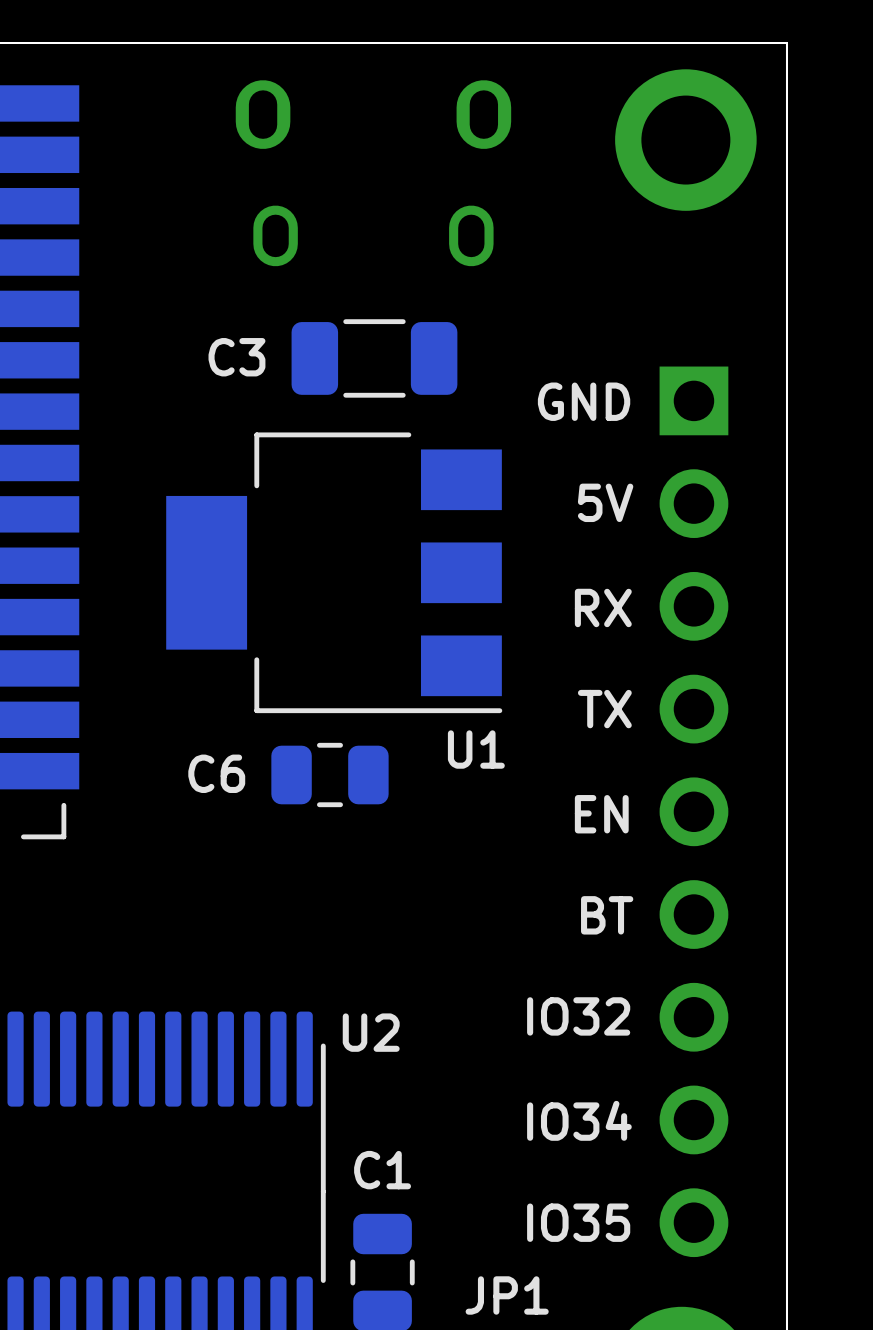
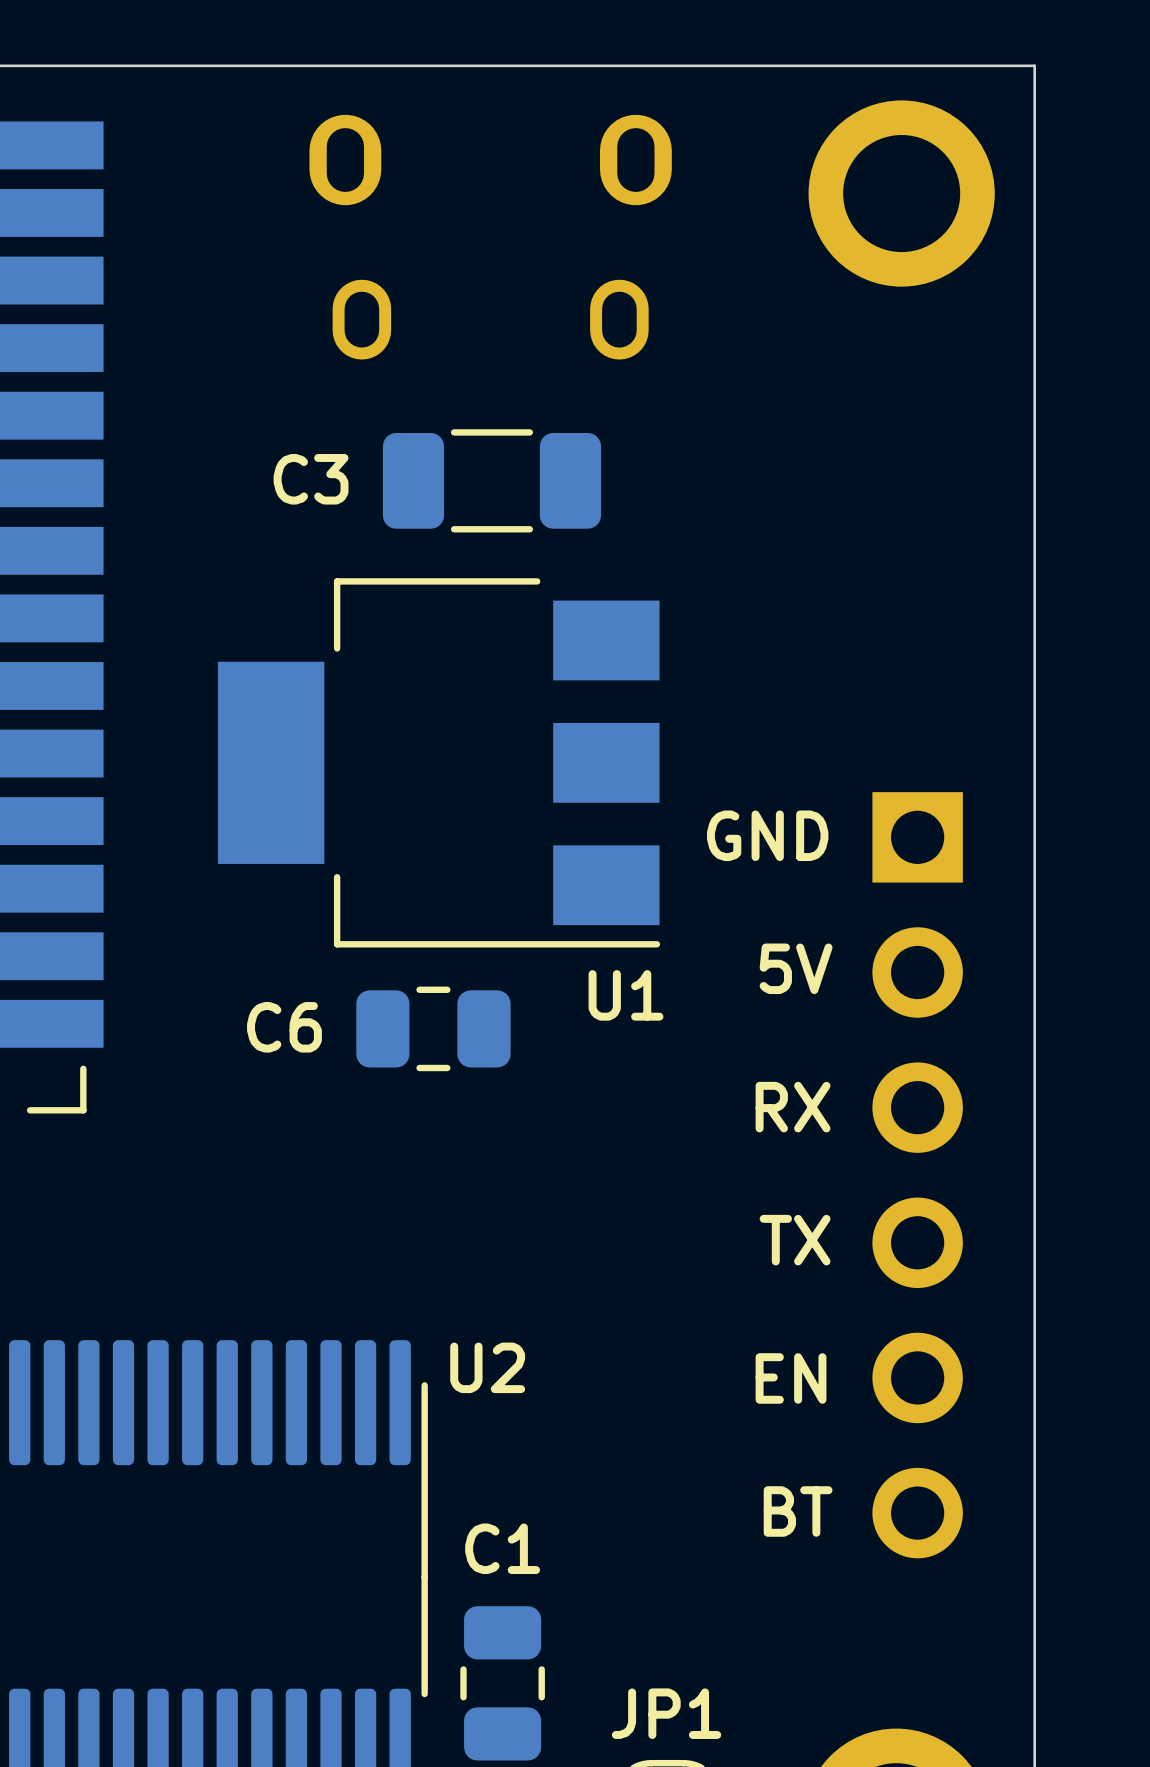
text: GND (584, 401) -> none
text: 5V (605, 502) -> none
text: RX (603, 607) -> GND (767, 835)
text: TX (604, 709) -> 5V (796, 968)
part: (693, 811) -> none
text: EN (601, 814) -> RX (793, 1107)
part: none -> (917, 1175)
text: BT (607, 915) -> TX (795, 1240)
text: IO32 (578, 1016) -> EN (791, 1378)
text: IO34 (579, 1120) -> BT (798, 1511)
text: IO35 (578, 1222) -> none

